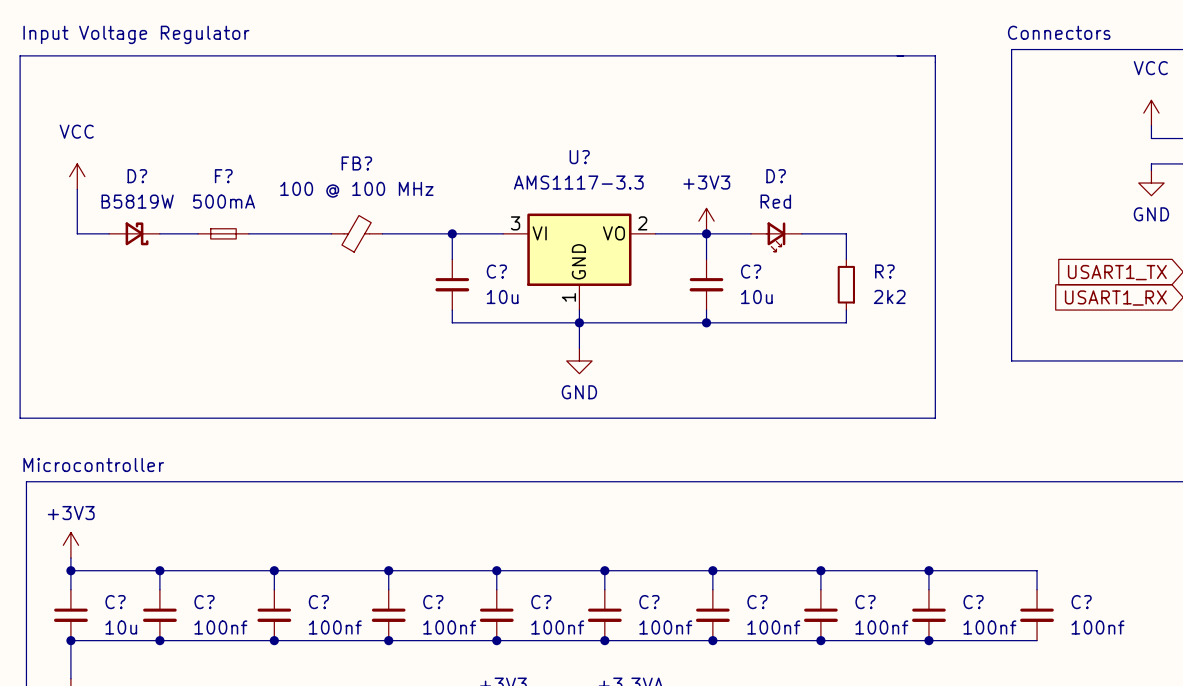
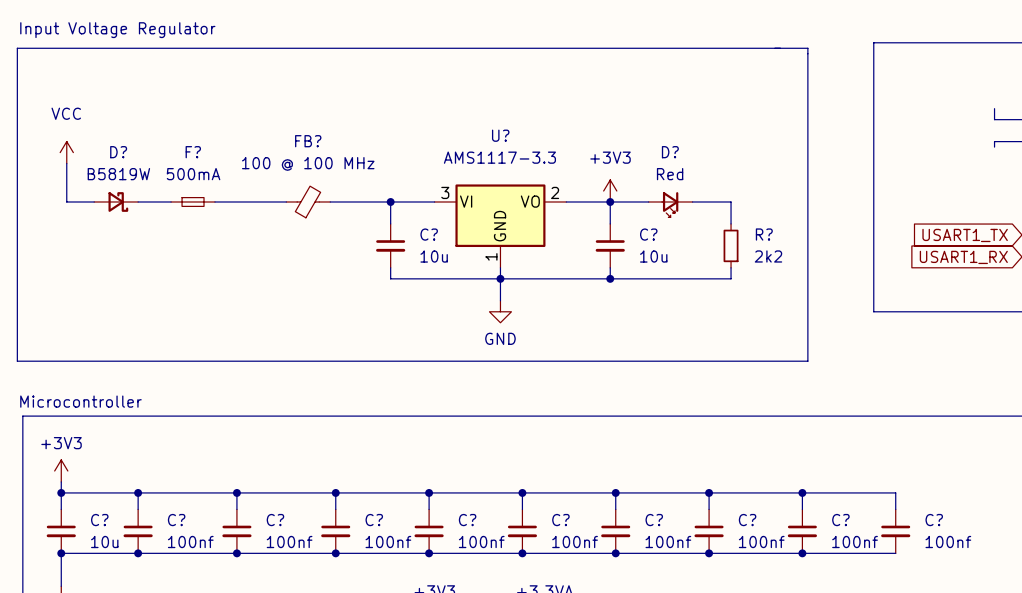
text: Connectors (1059, 32) -> none
power symbol: VCC (1151, 113) -> none
power symbol: GND (1151, 183) -> none

